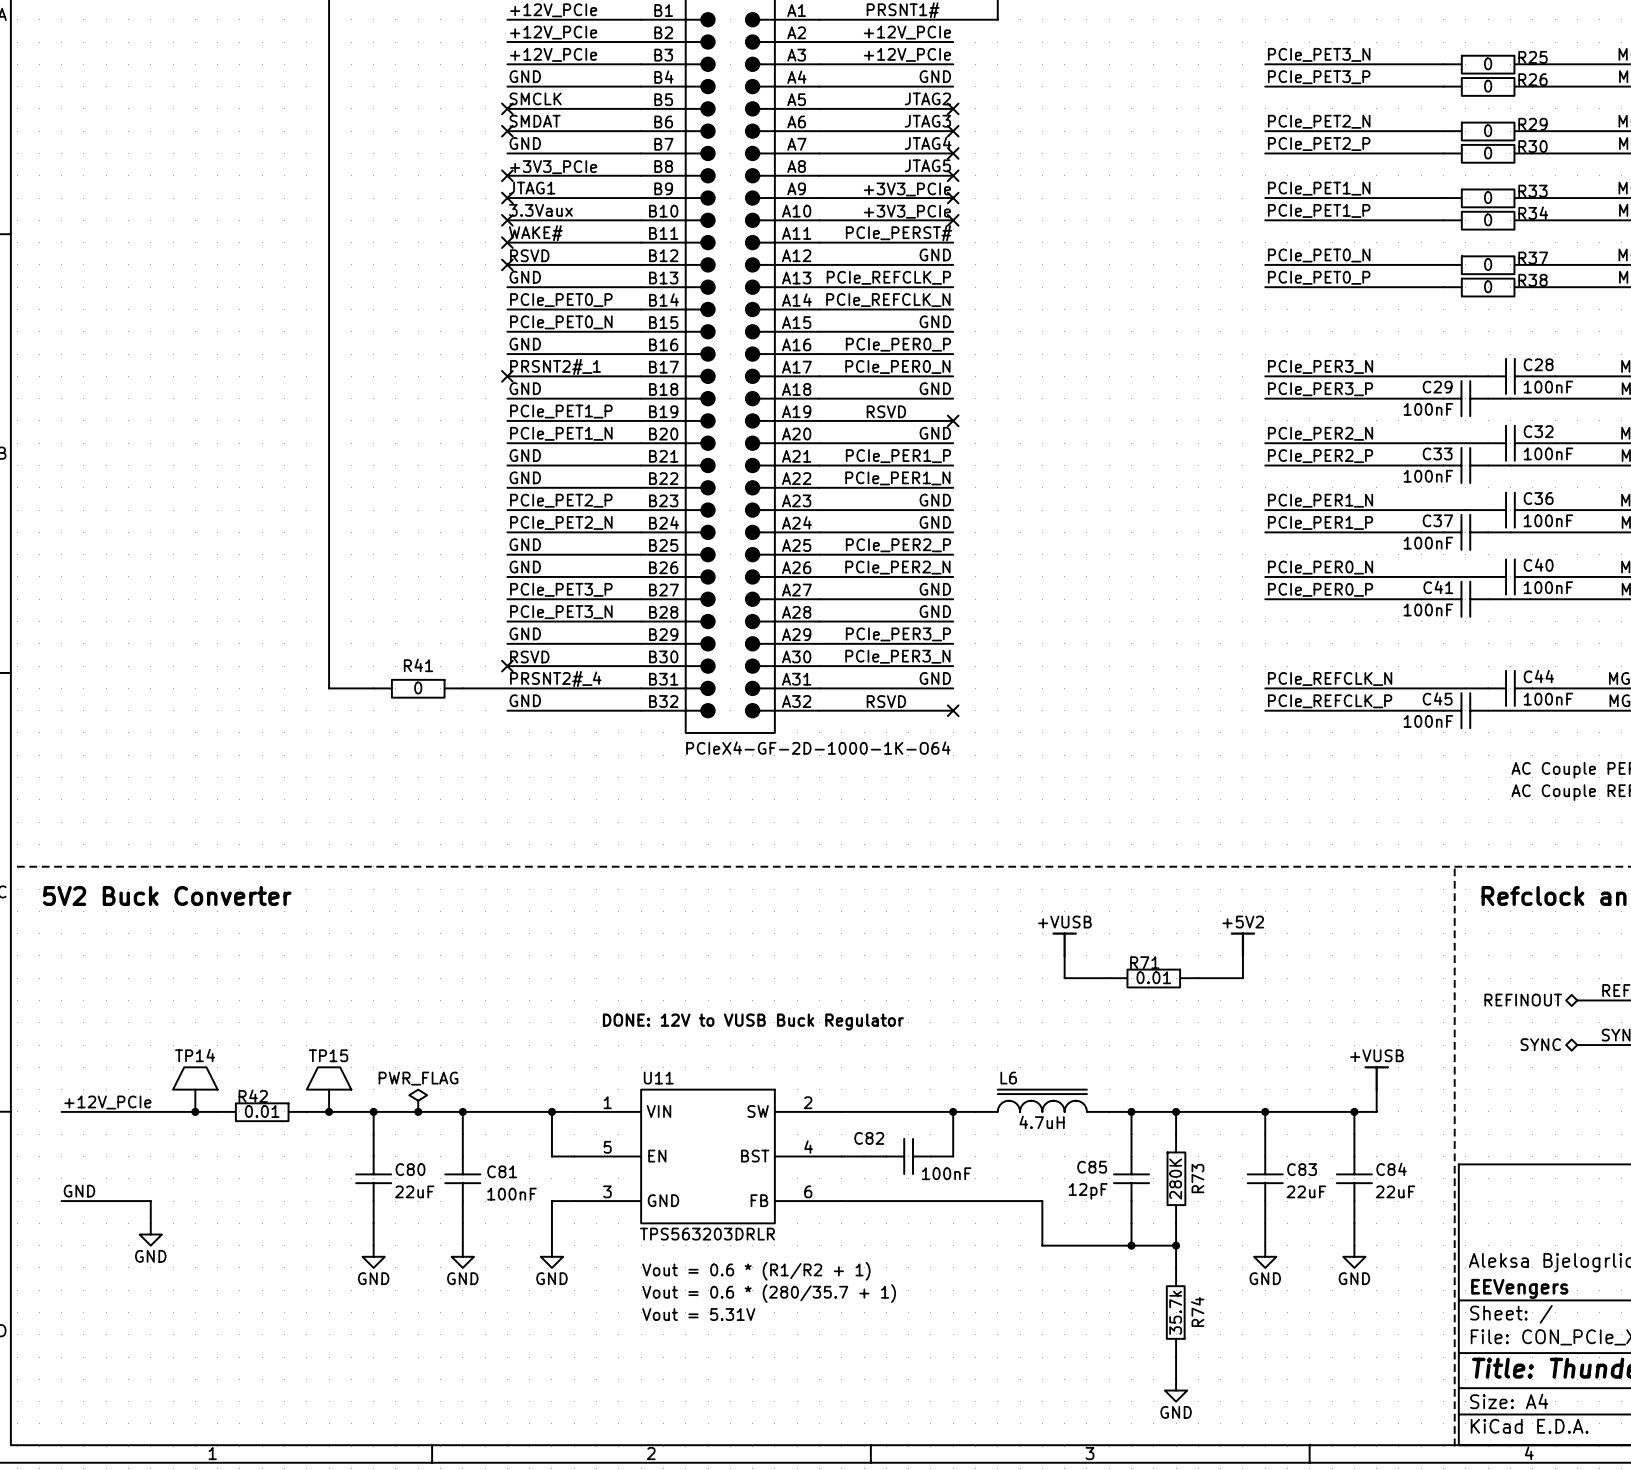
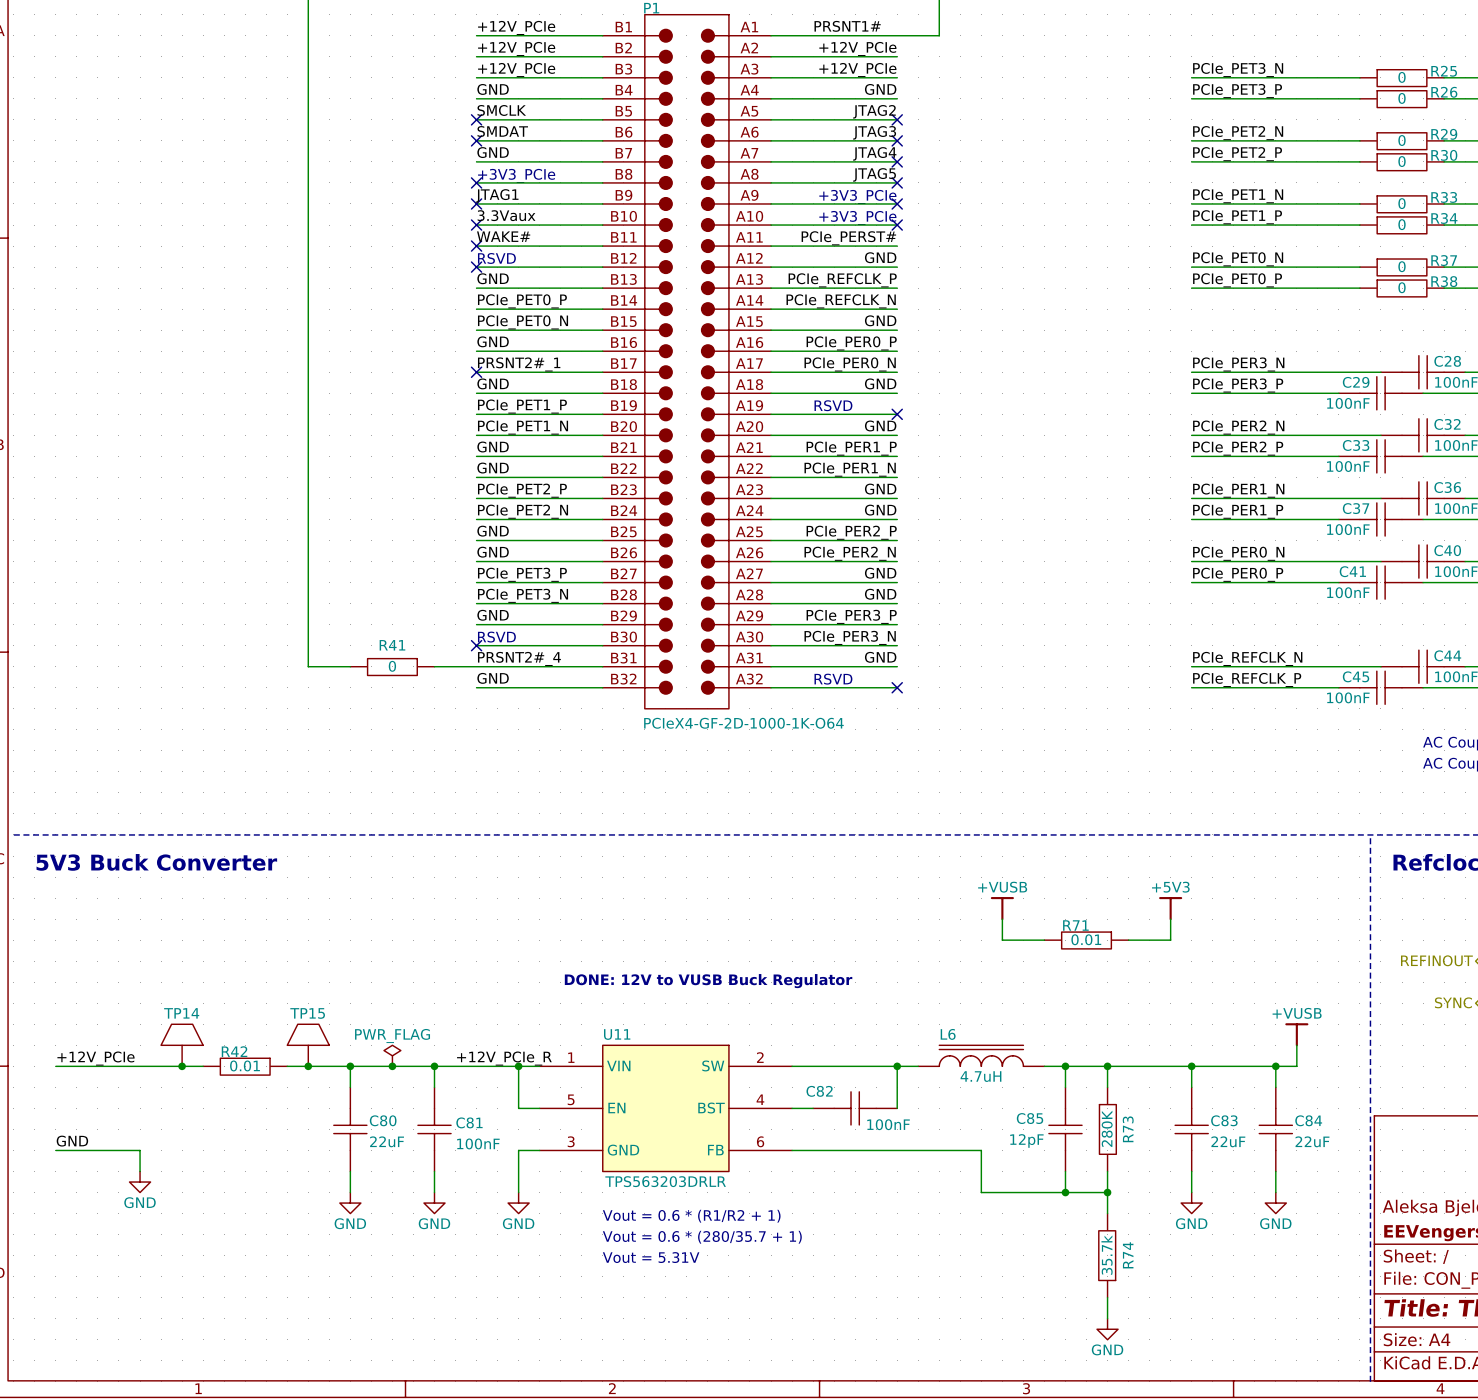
text: 5V2 Buck Converter (167, 895) -> 5V3 Buck Converter (156, 862)
power symbol: +5V2 (1242, 944) -> +5V3 (1170, 908)
label: none -> +12V_PCIe_R (504, 1058)

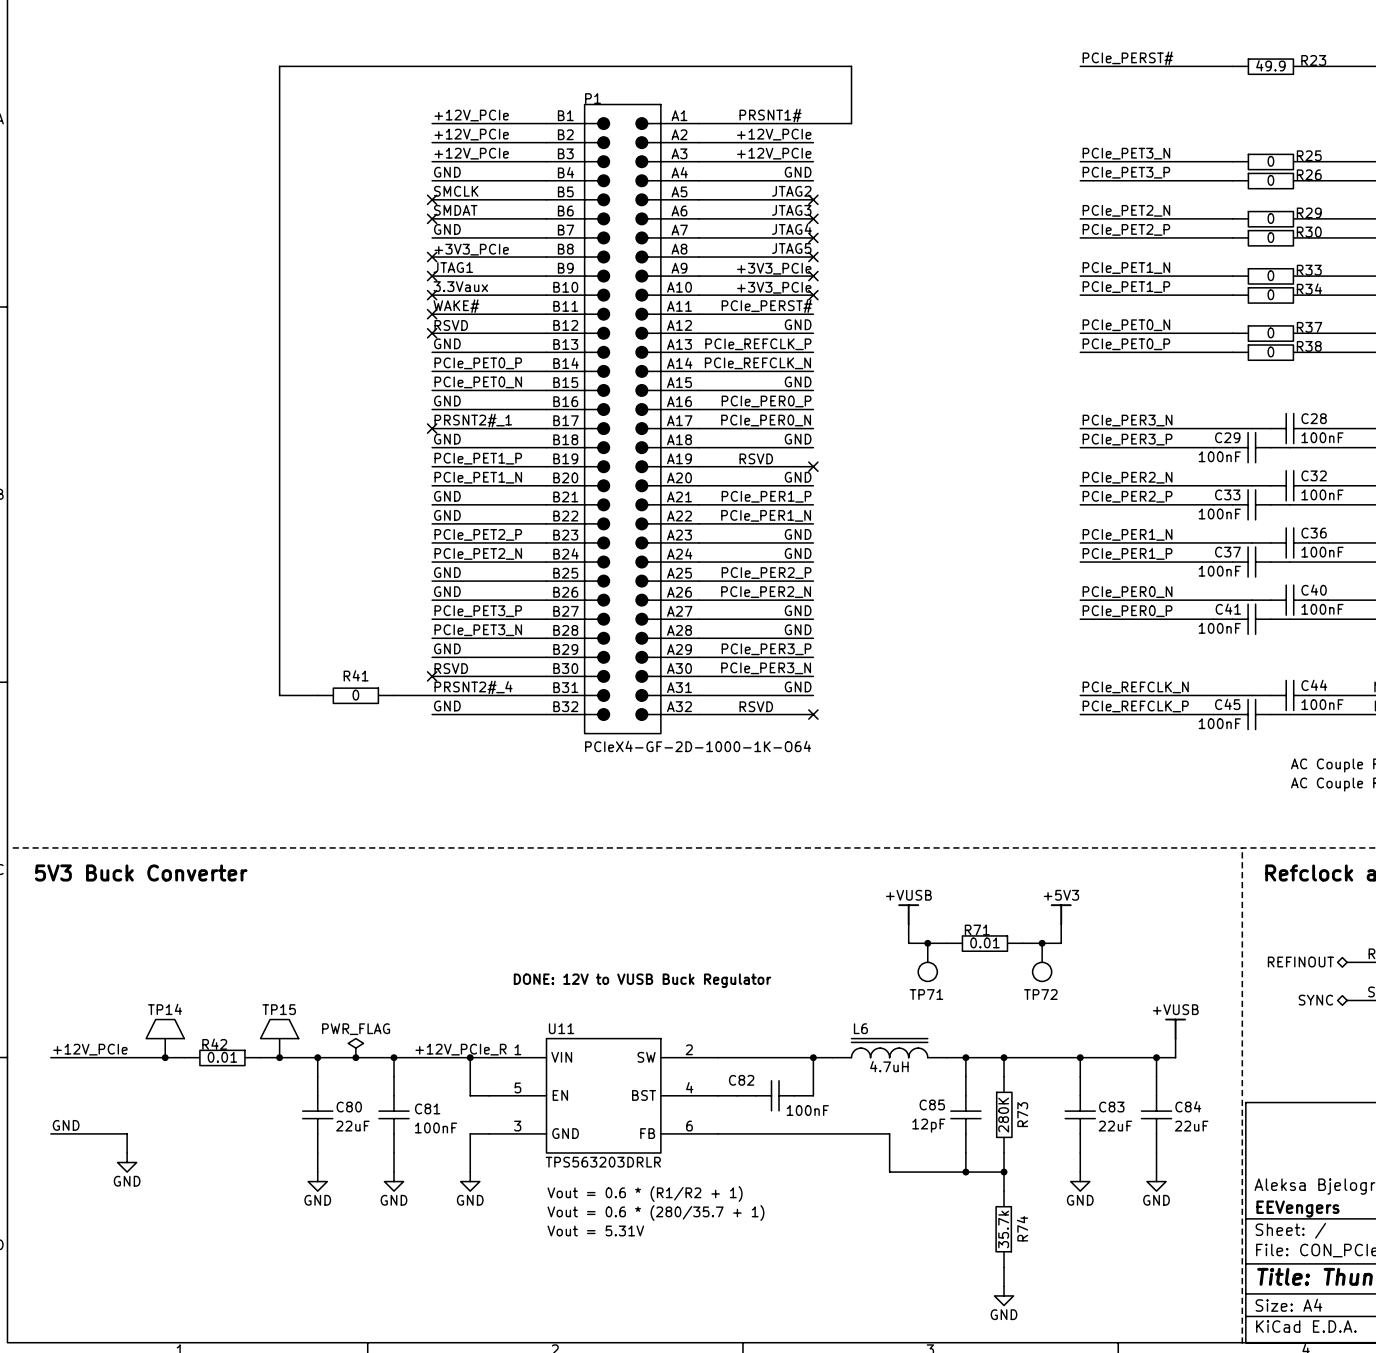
junction: none -> (927, 943)
junction: none -> (1042, 943)
TP71: none -> (927, 962)
TP72: none -> (1042, 962)

